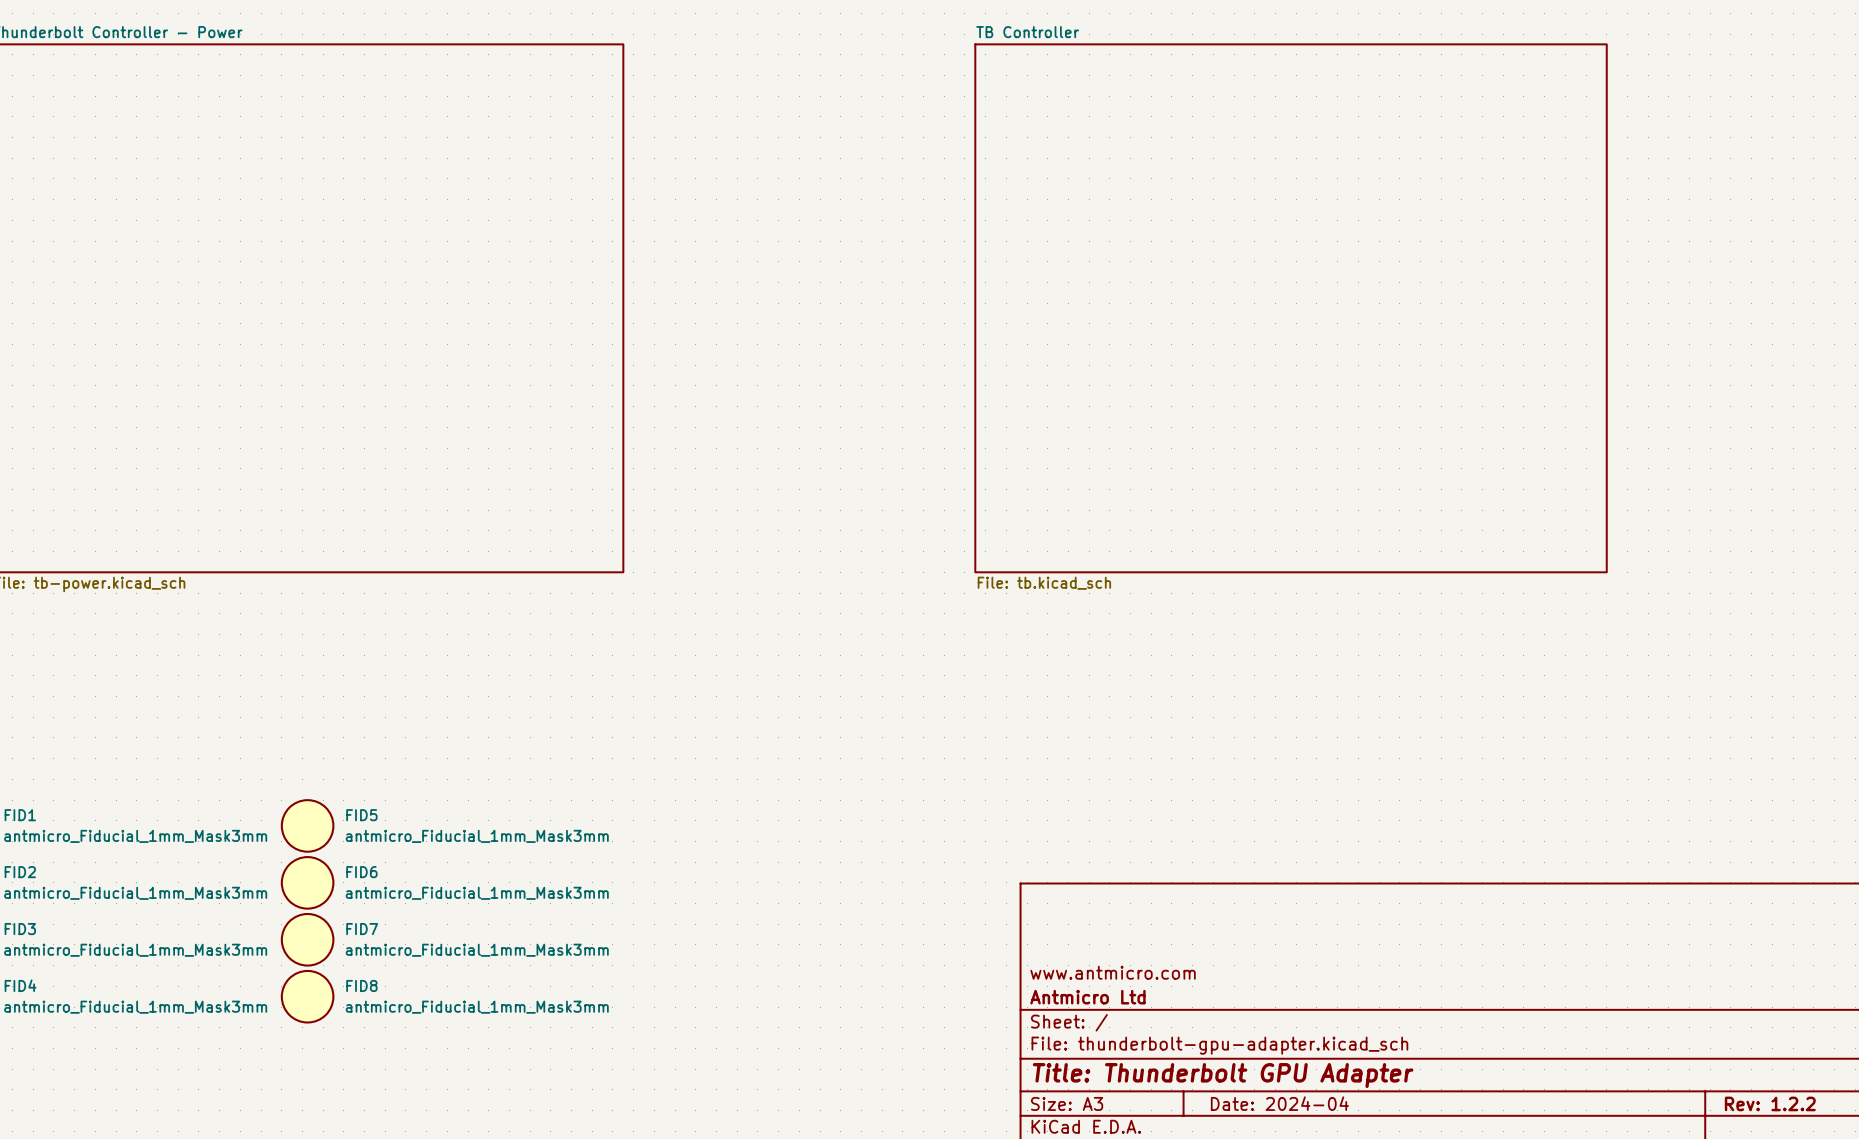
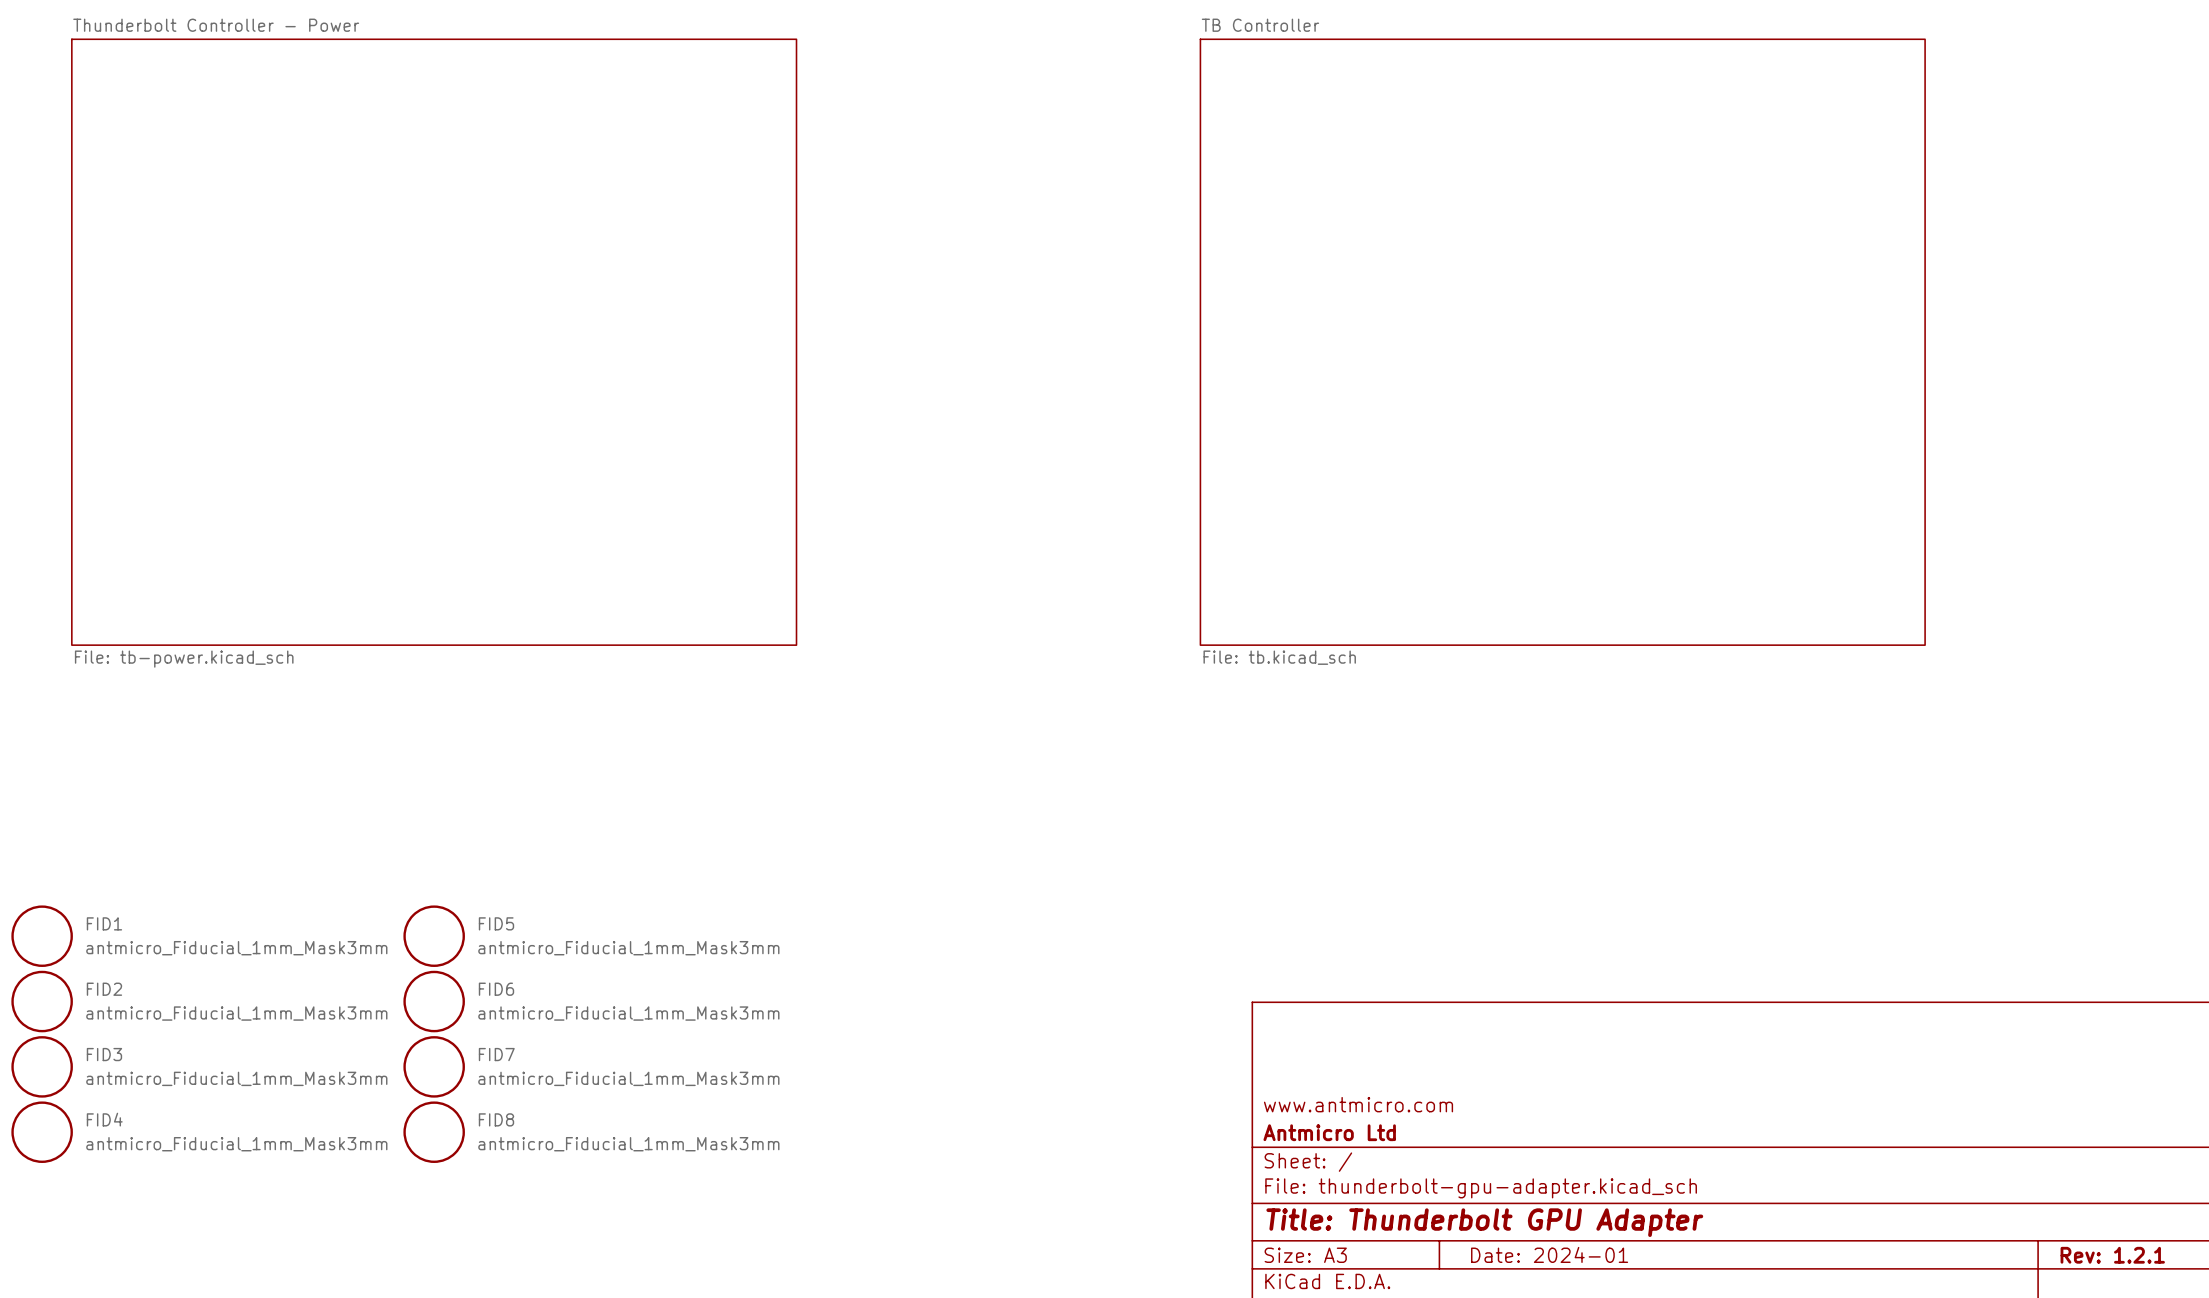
title block: Date: 2024-04 (1279, 1103) -> Date: 2024-01 (1549, 1254)
title block: Rev: 1.2.2 (1770, 1103) -> Rev: 1.2.1 (2112, 1255)

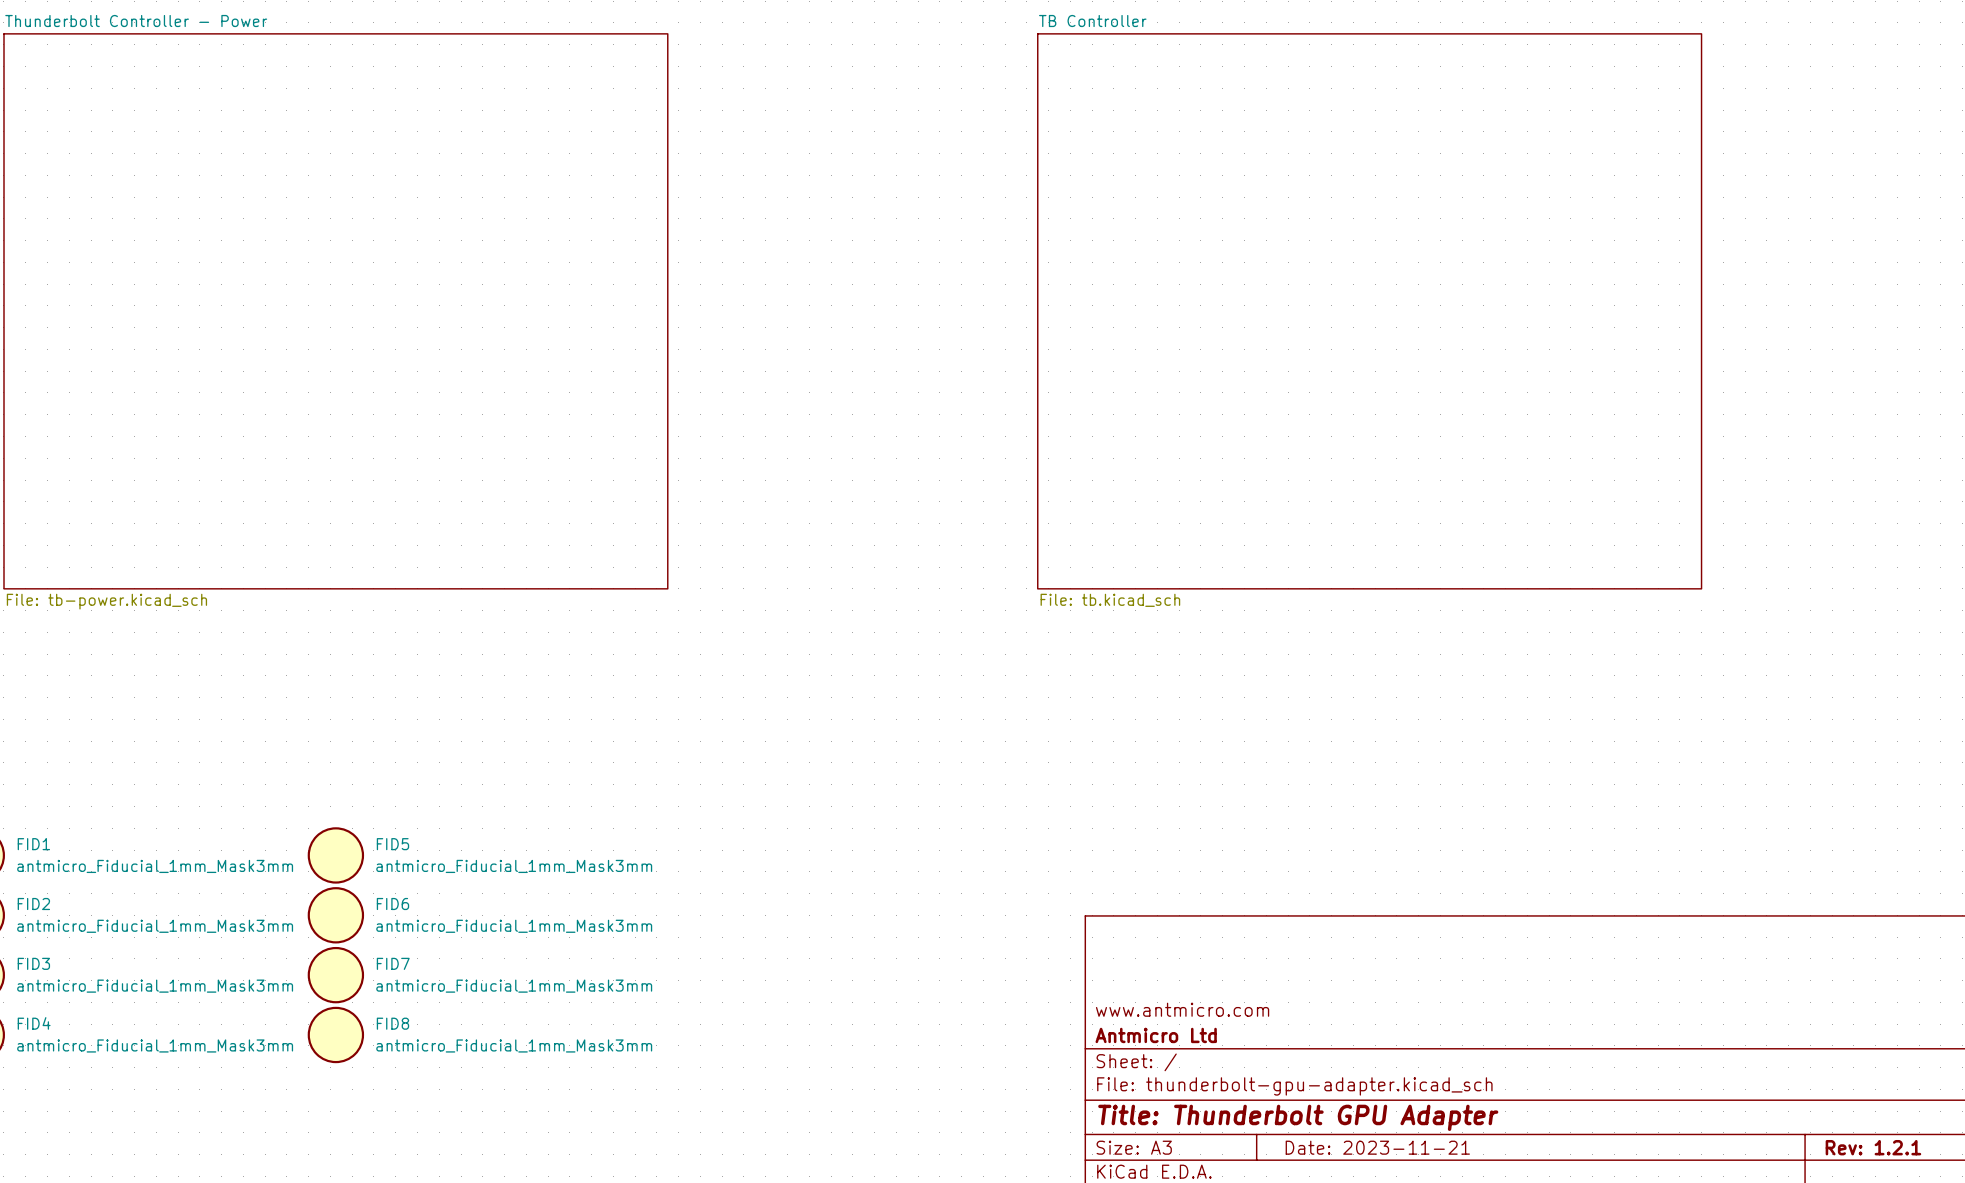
title block: Date: 2024-01 (1549, 1254) -> Date: 2023-11-21 (1377, 1147)

